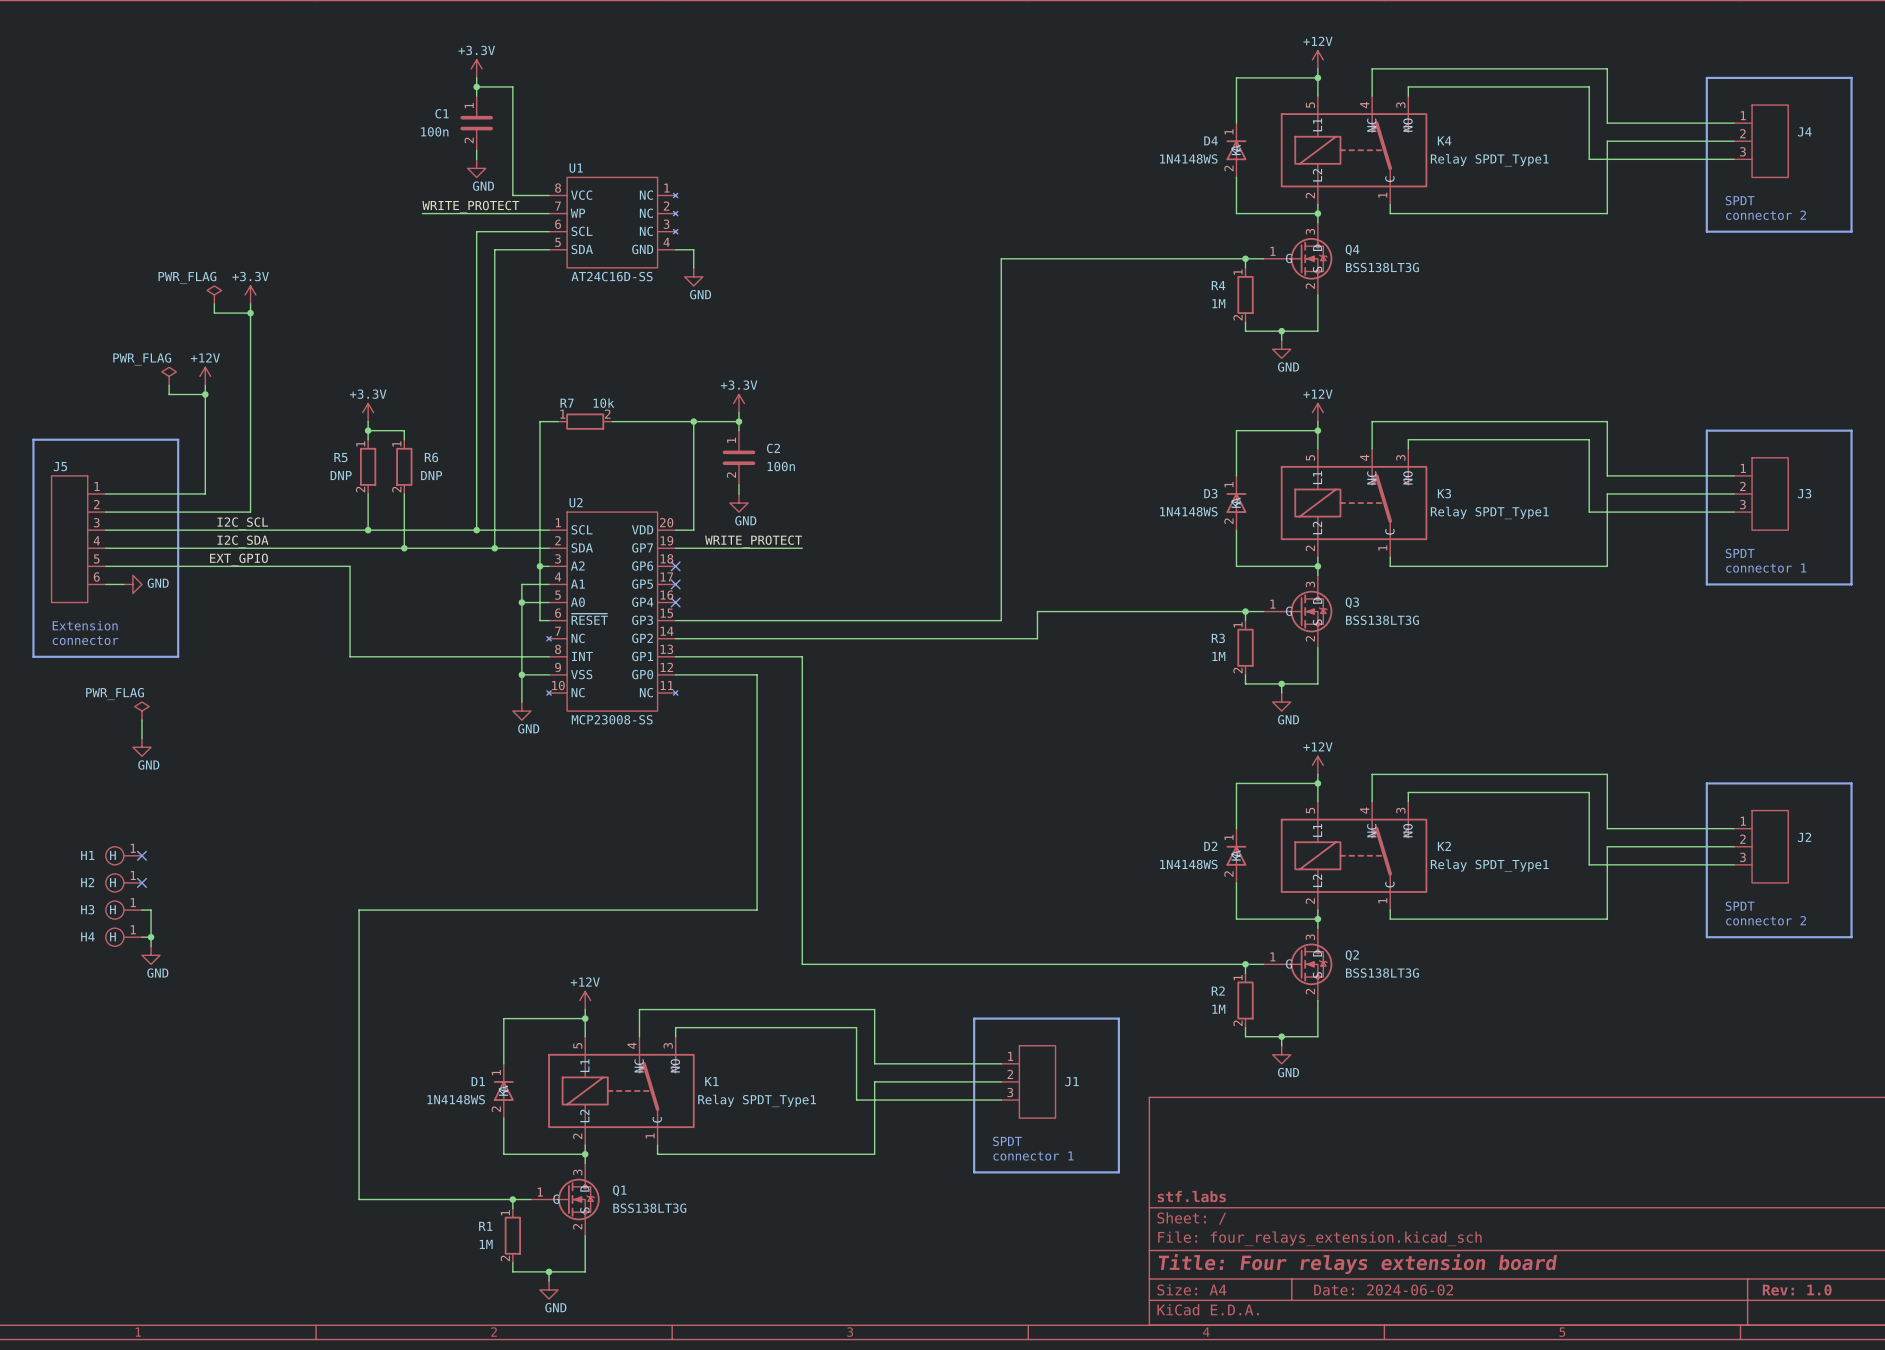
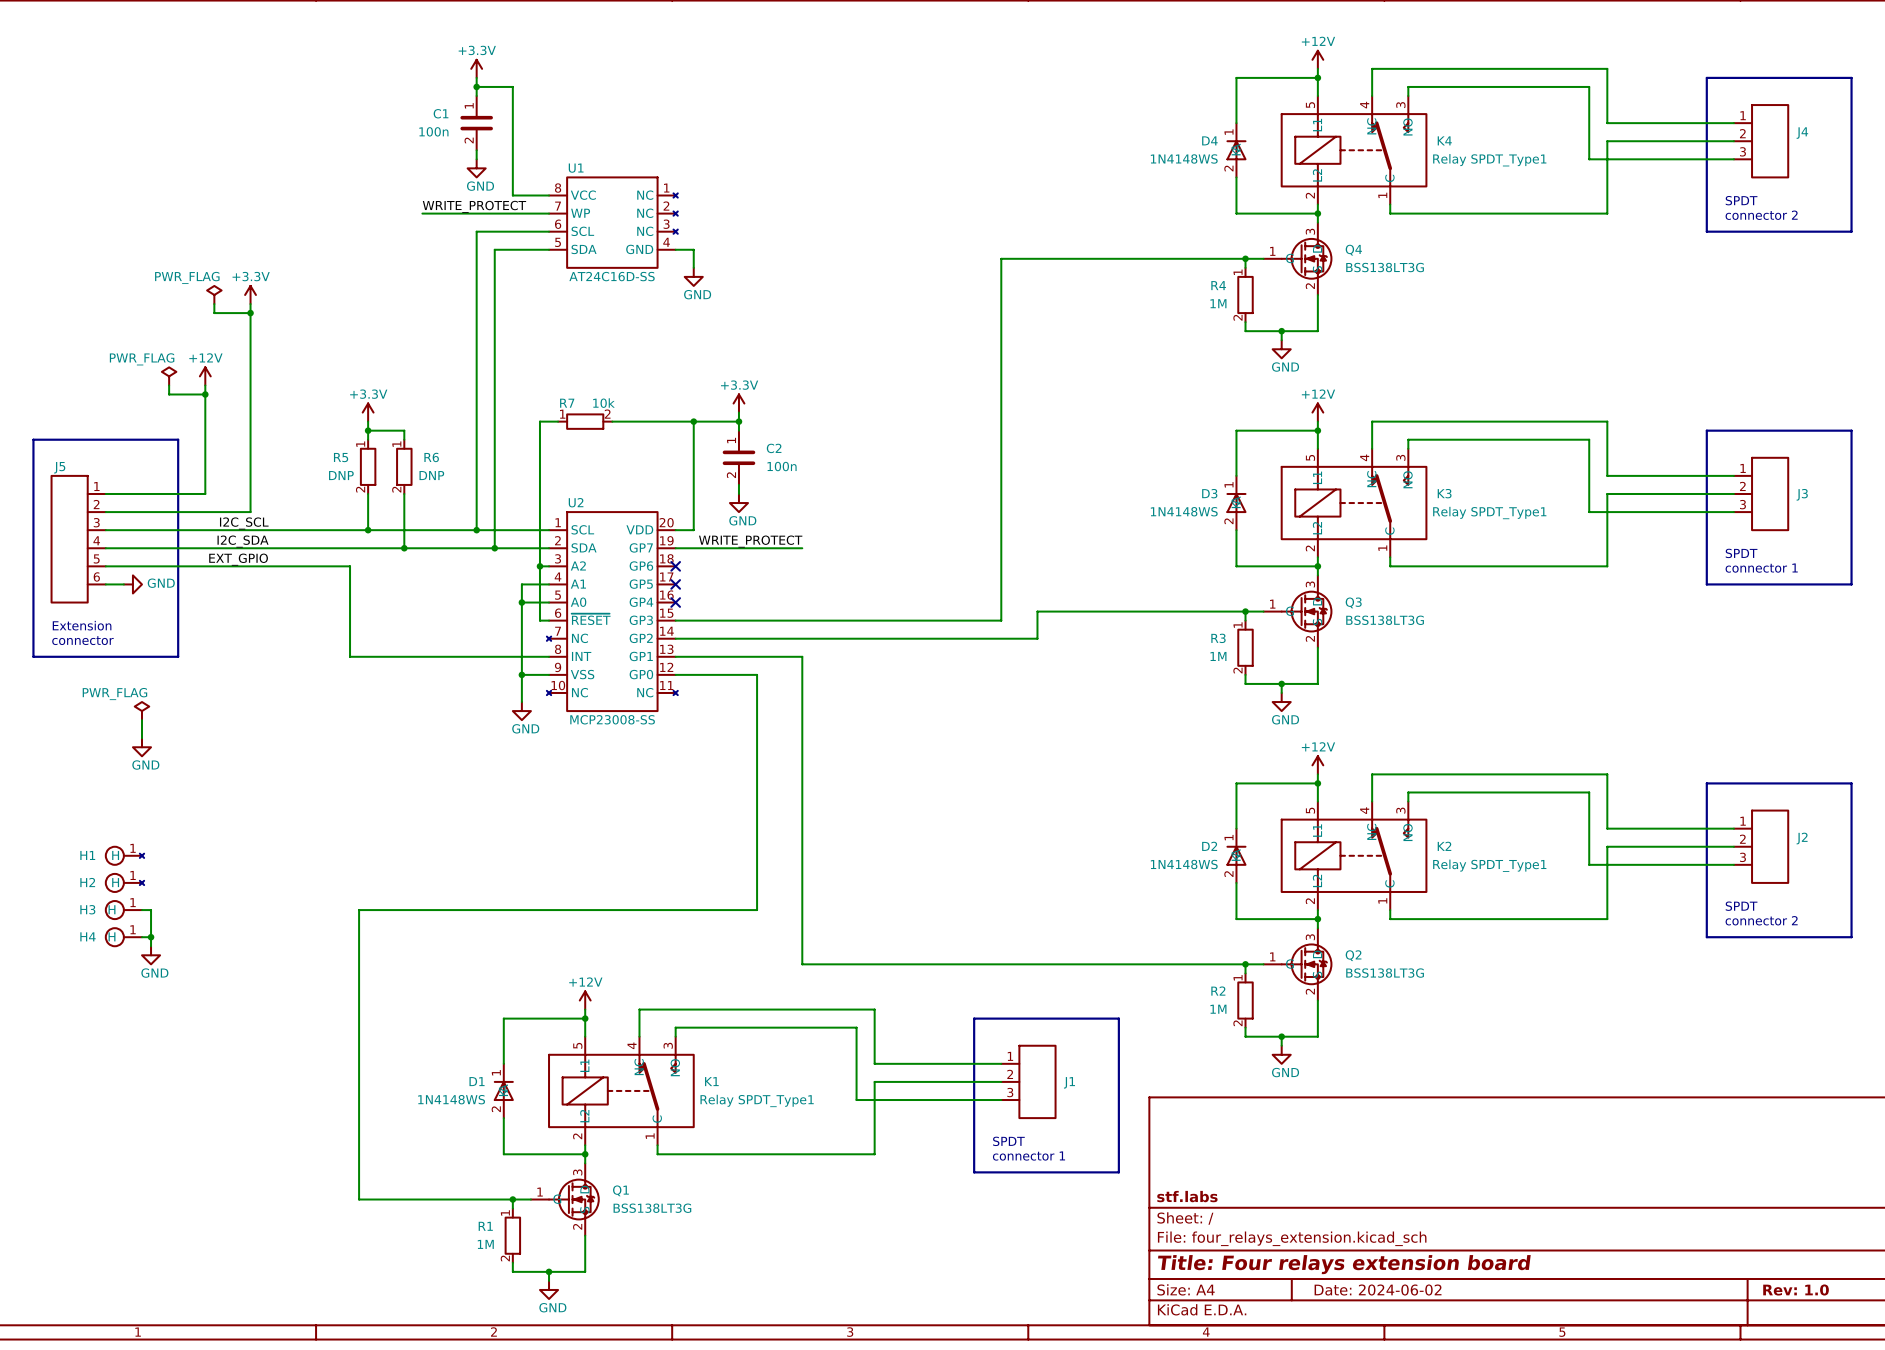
H1 symbol: [105, 846, 142, 865] -> [105, 846, 145, 865]
no-connect mark: (141, 855) -> none
H2 symbol: [105, 873, 142, 892] -> [105, 873, 145, 892]
no-connect mark: (141, 882) -> none

